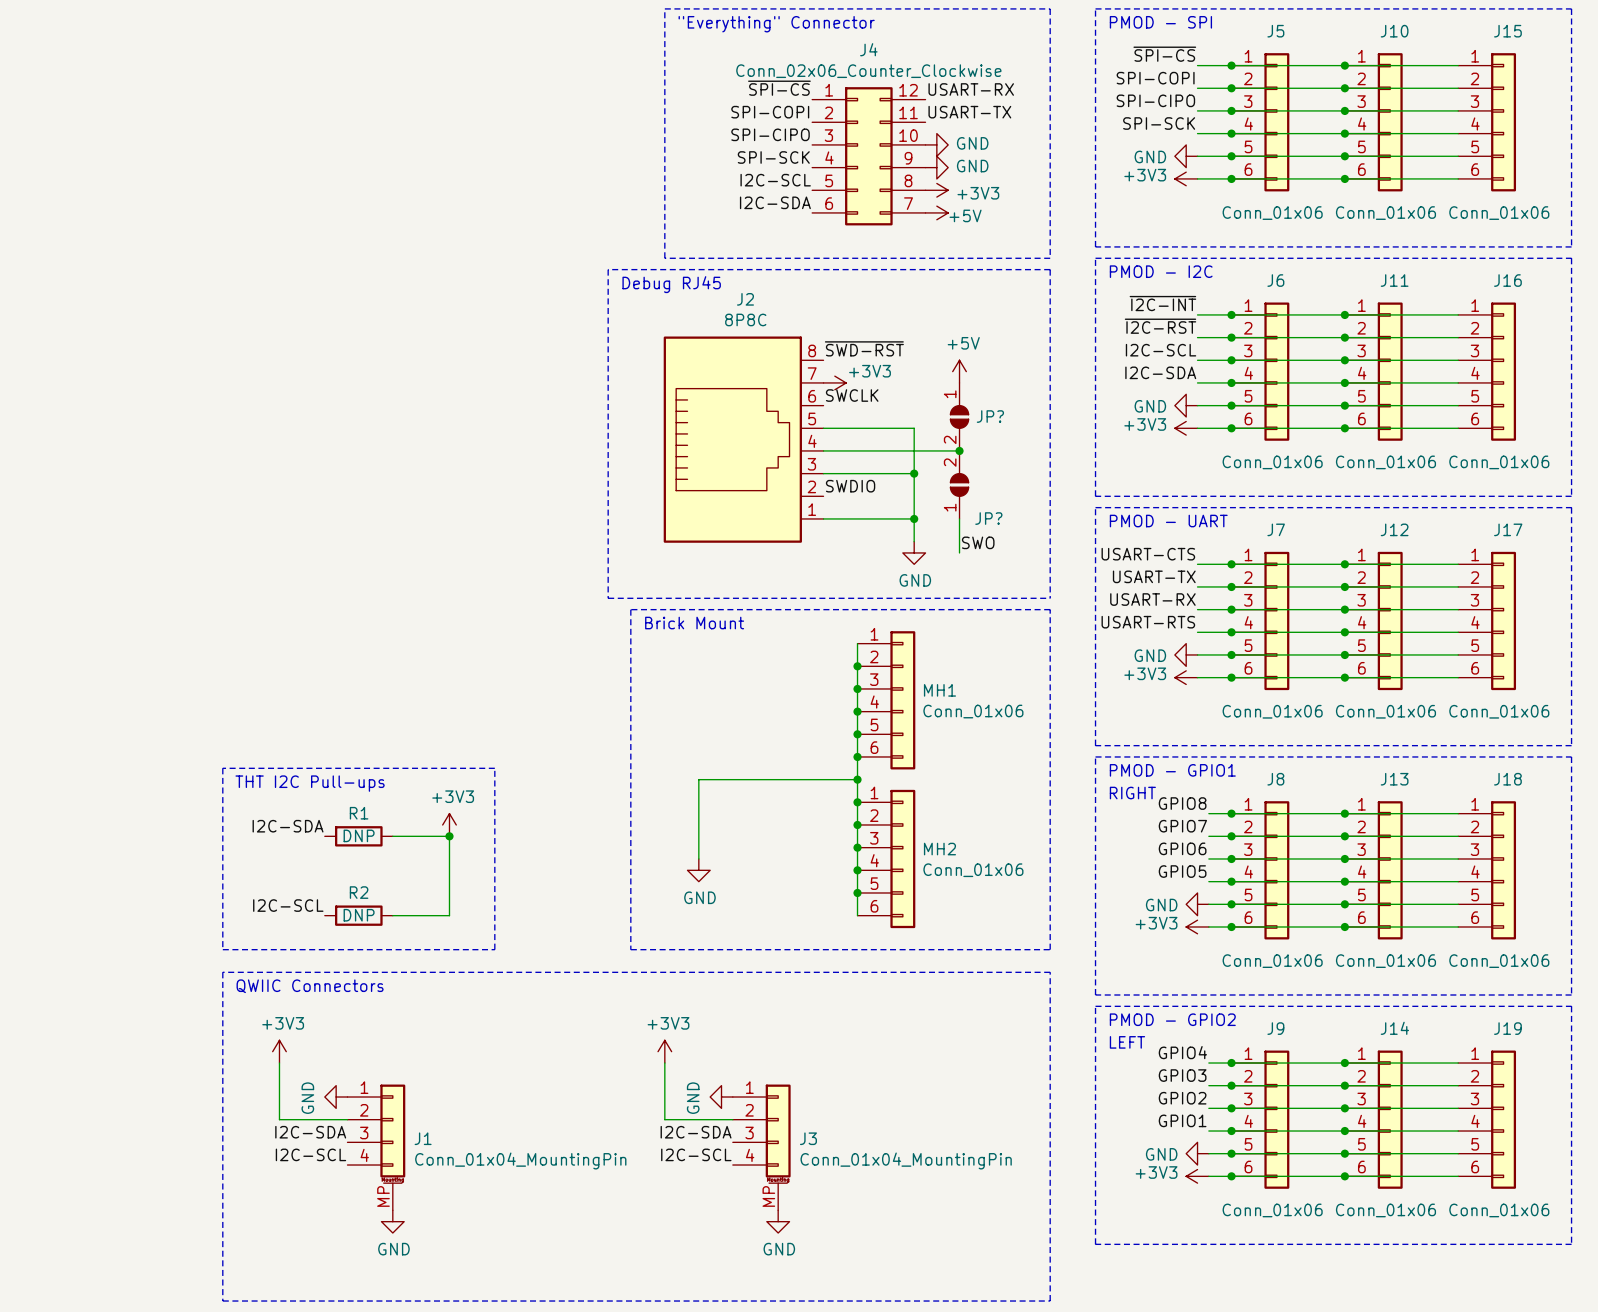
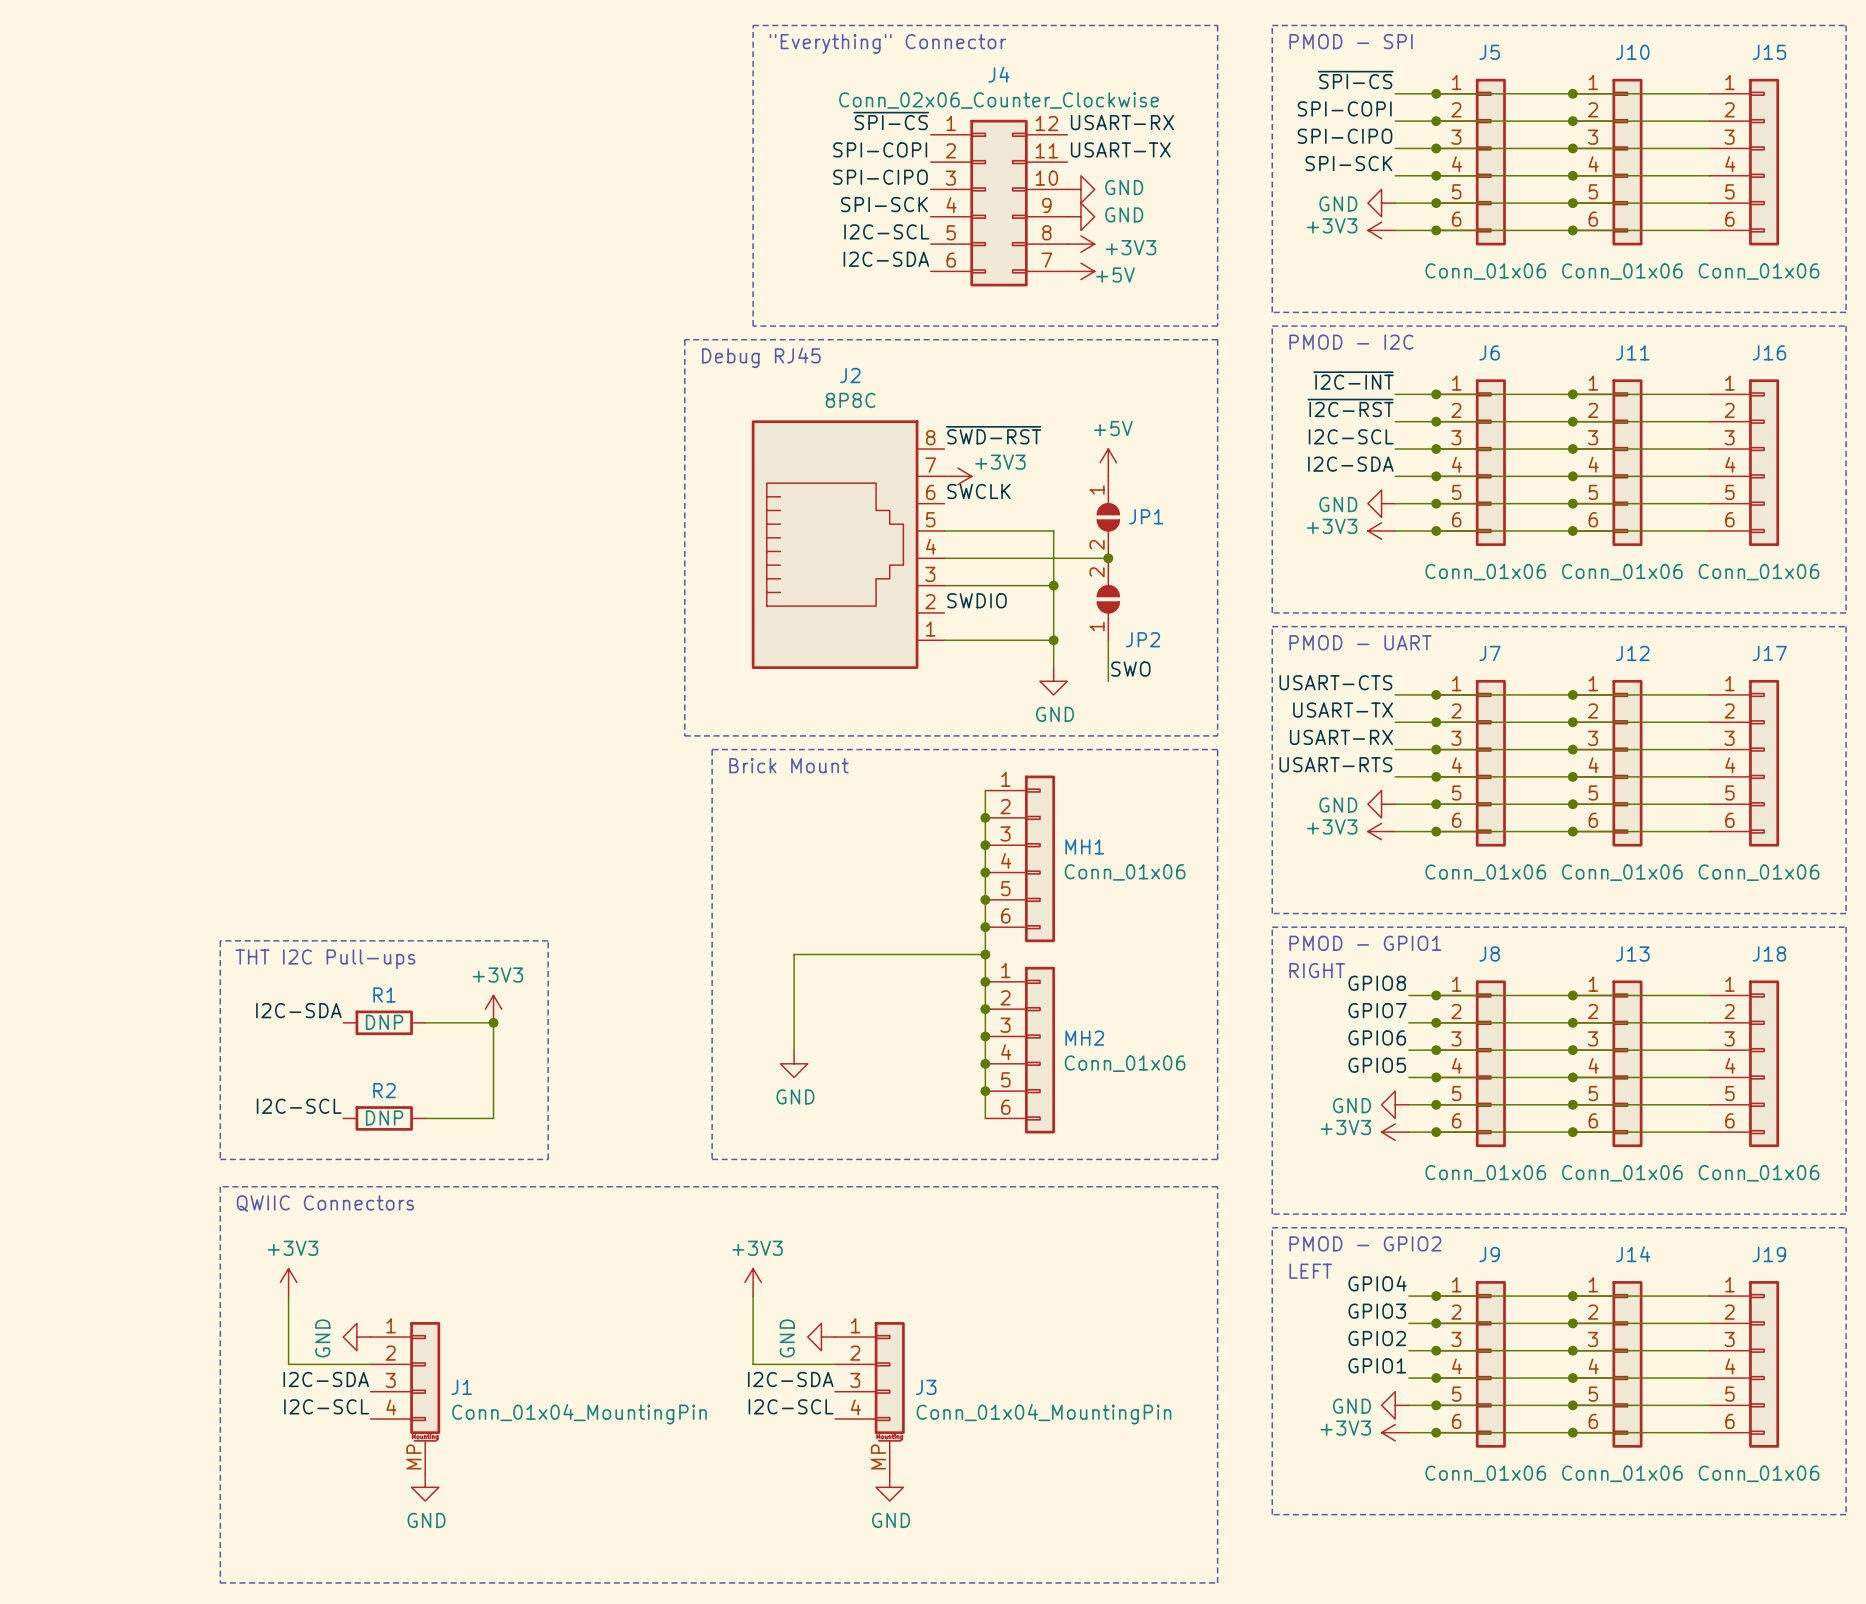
JP? name: JP? (990, 416) -> JP1 (1146, 516)
JP? name: JP? (988, 518) -> JP2 (1143, 639)

